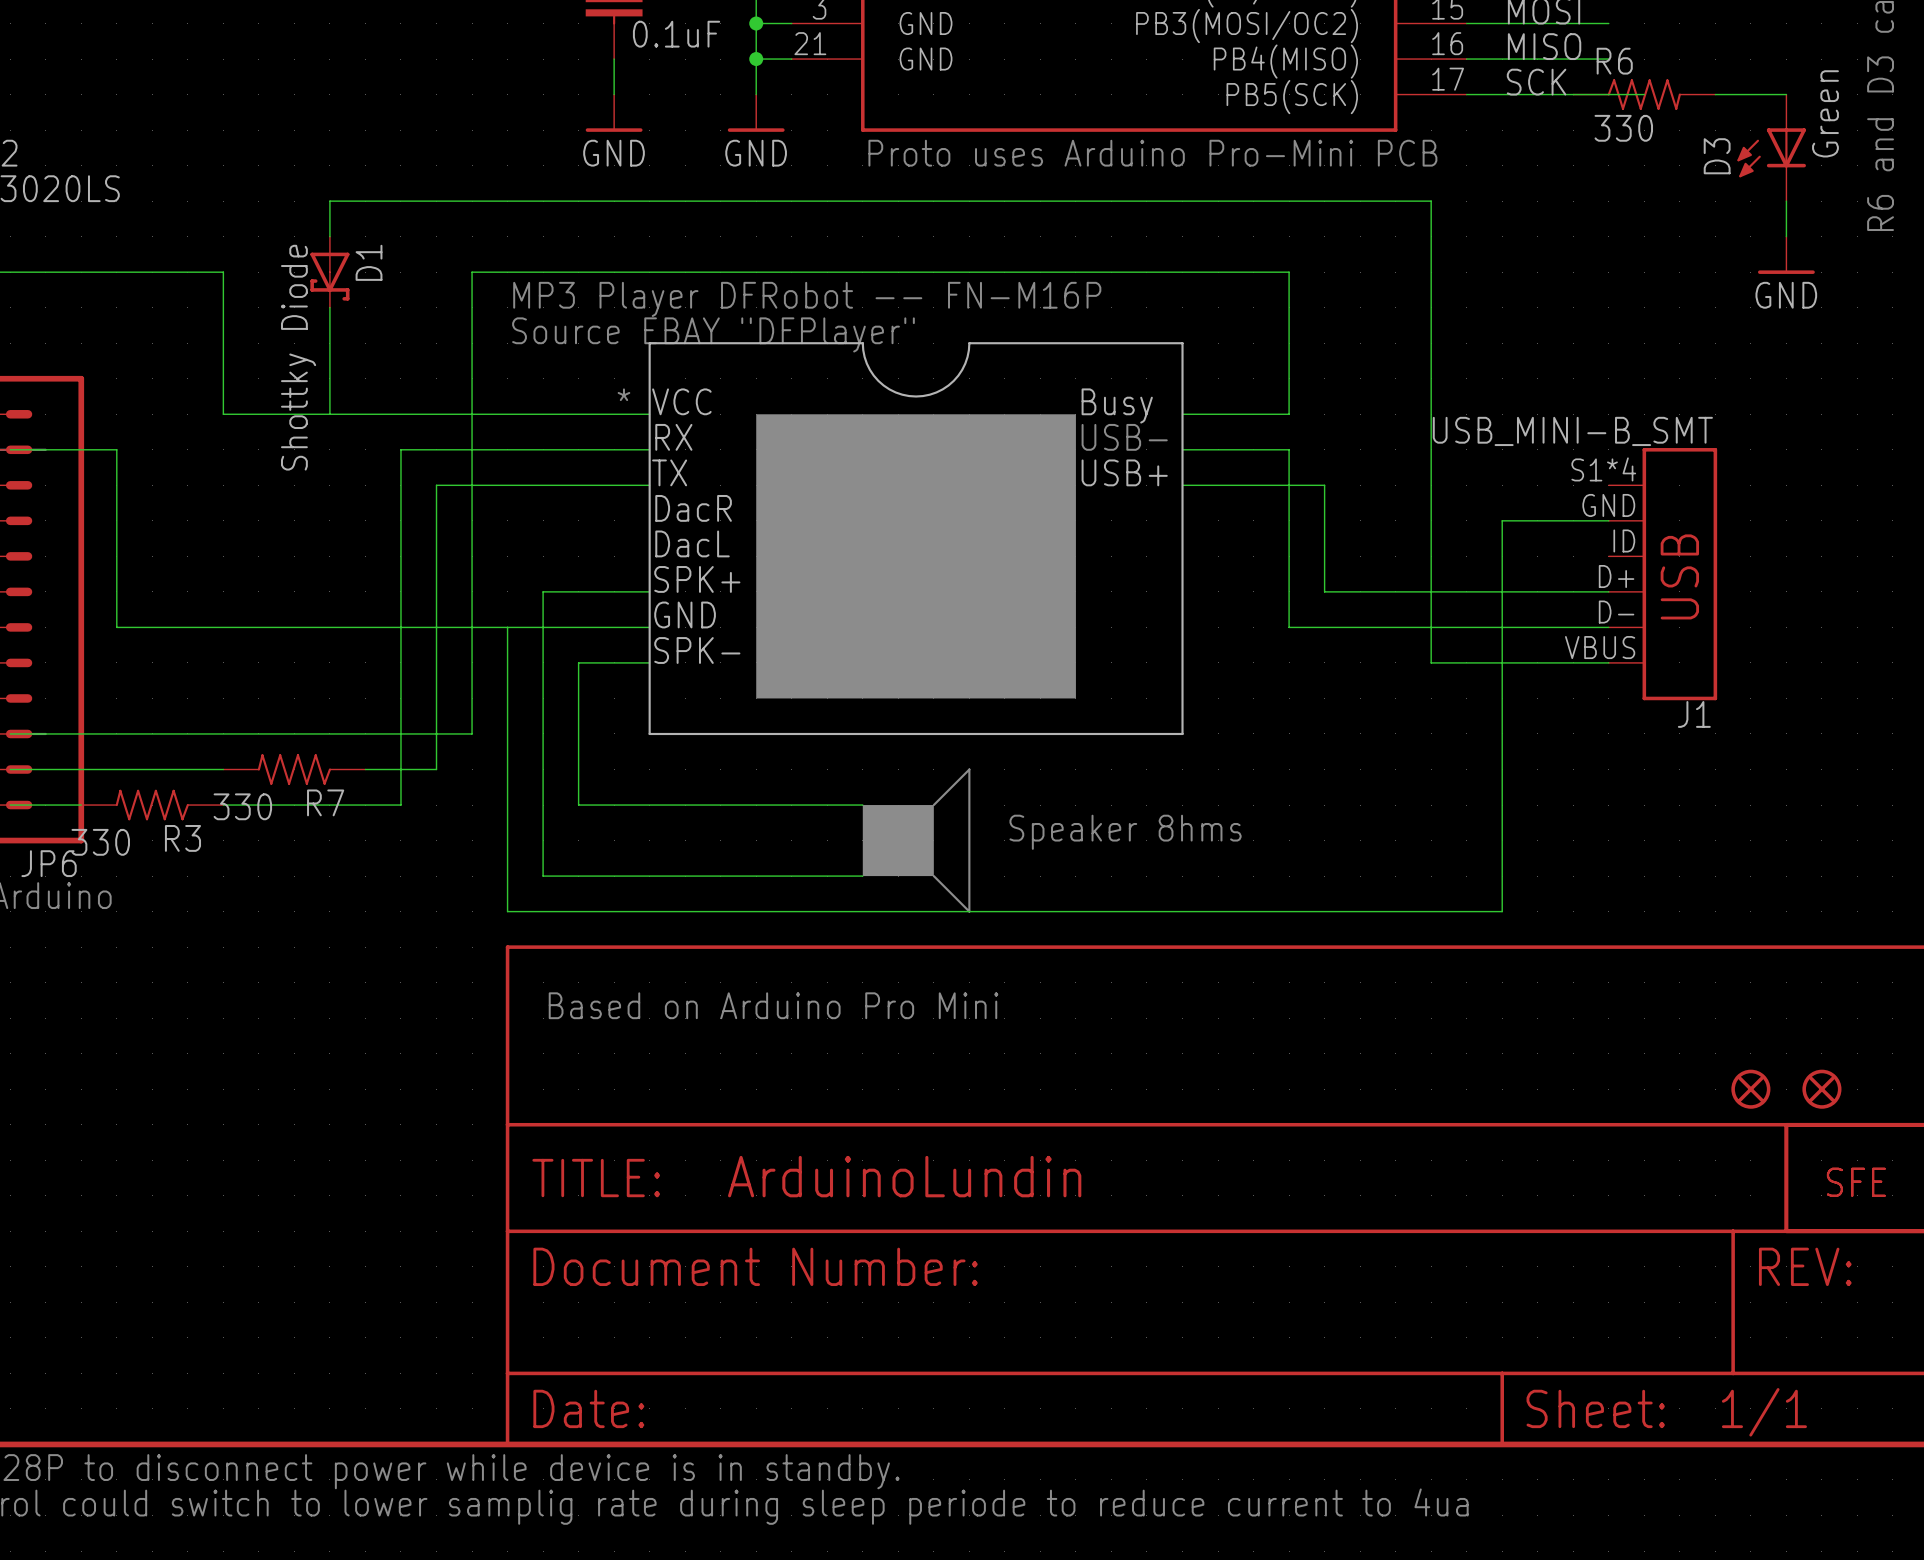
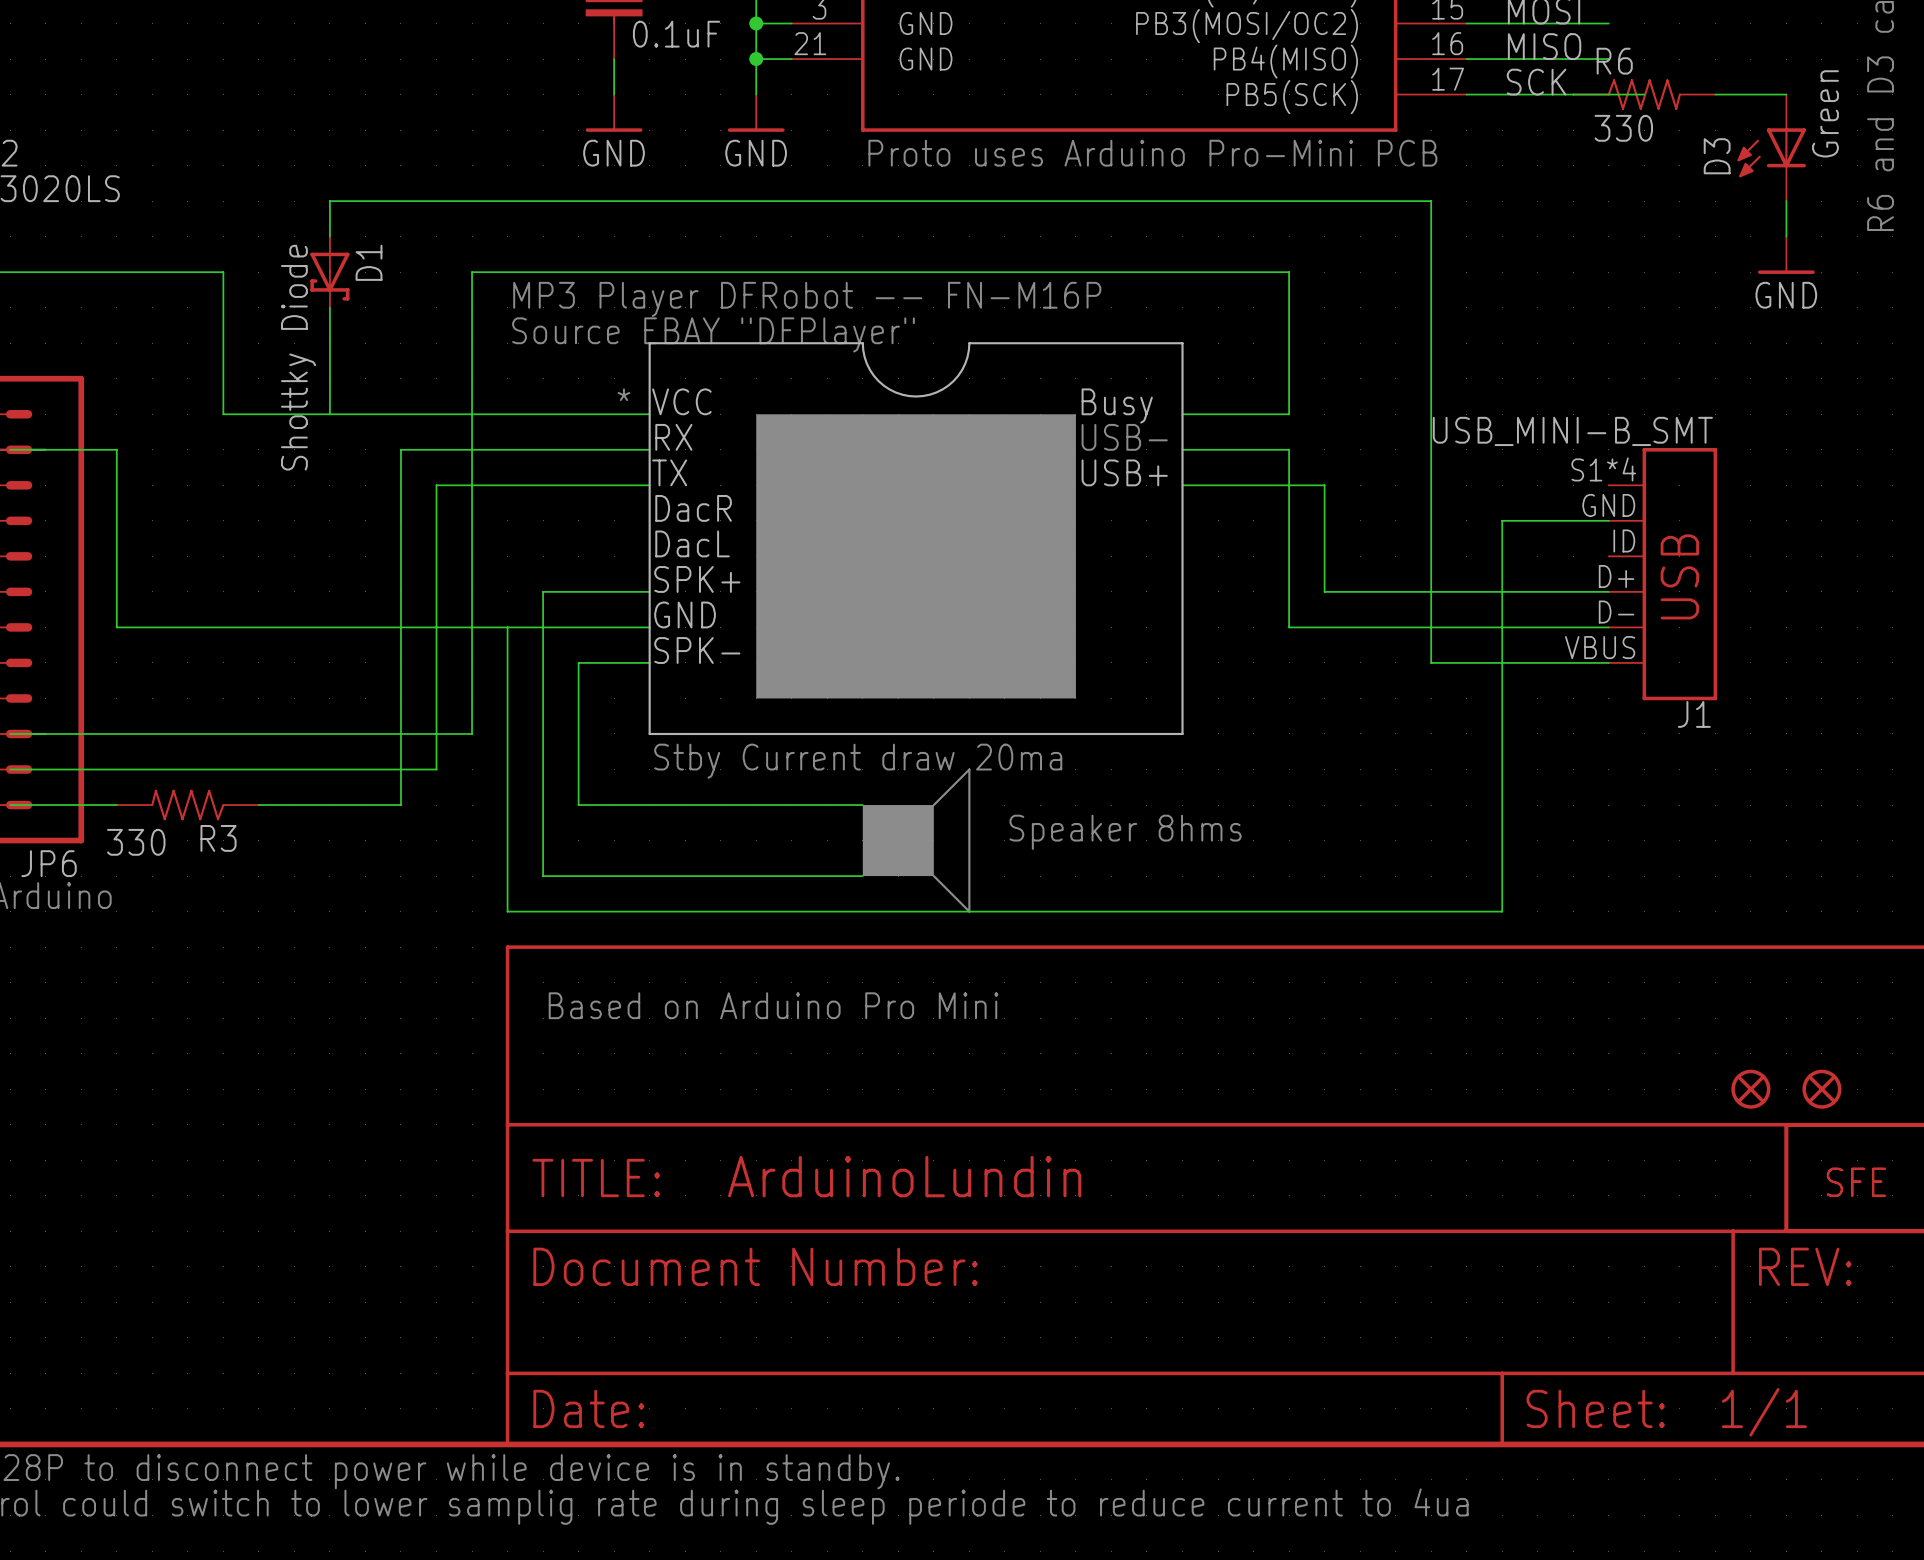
text: none -> Stby Current draw 20ma (858, 761)
R7: 330 (294, 769) -> none
R3 position: (152, 805) -> (187, 805)

